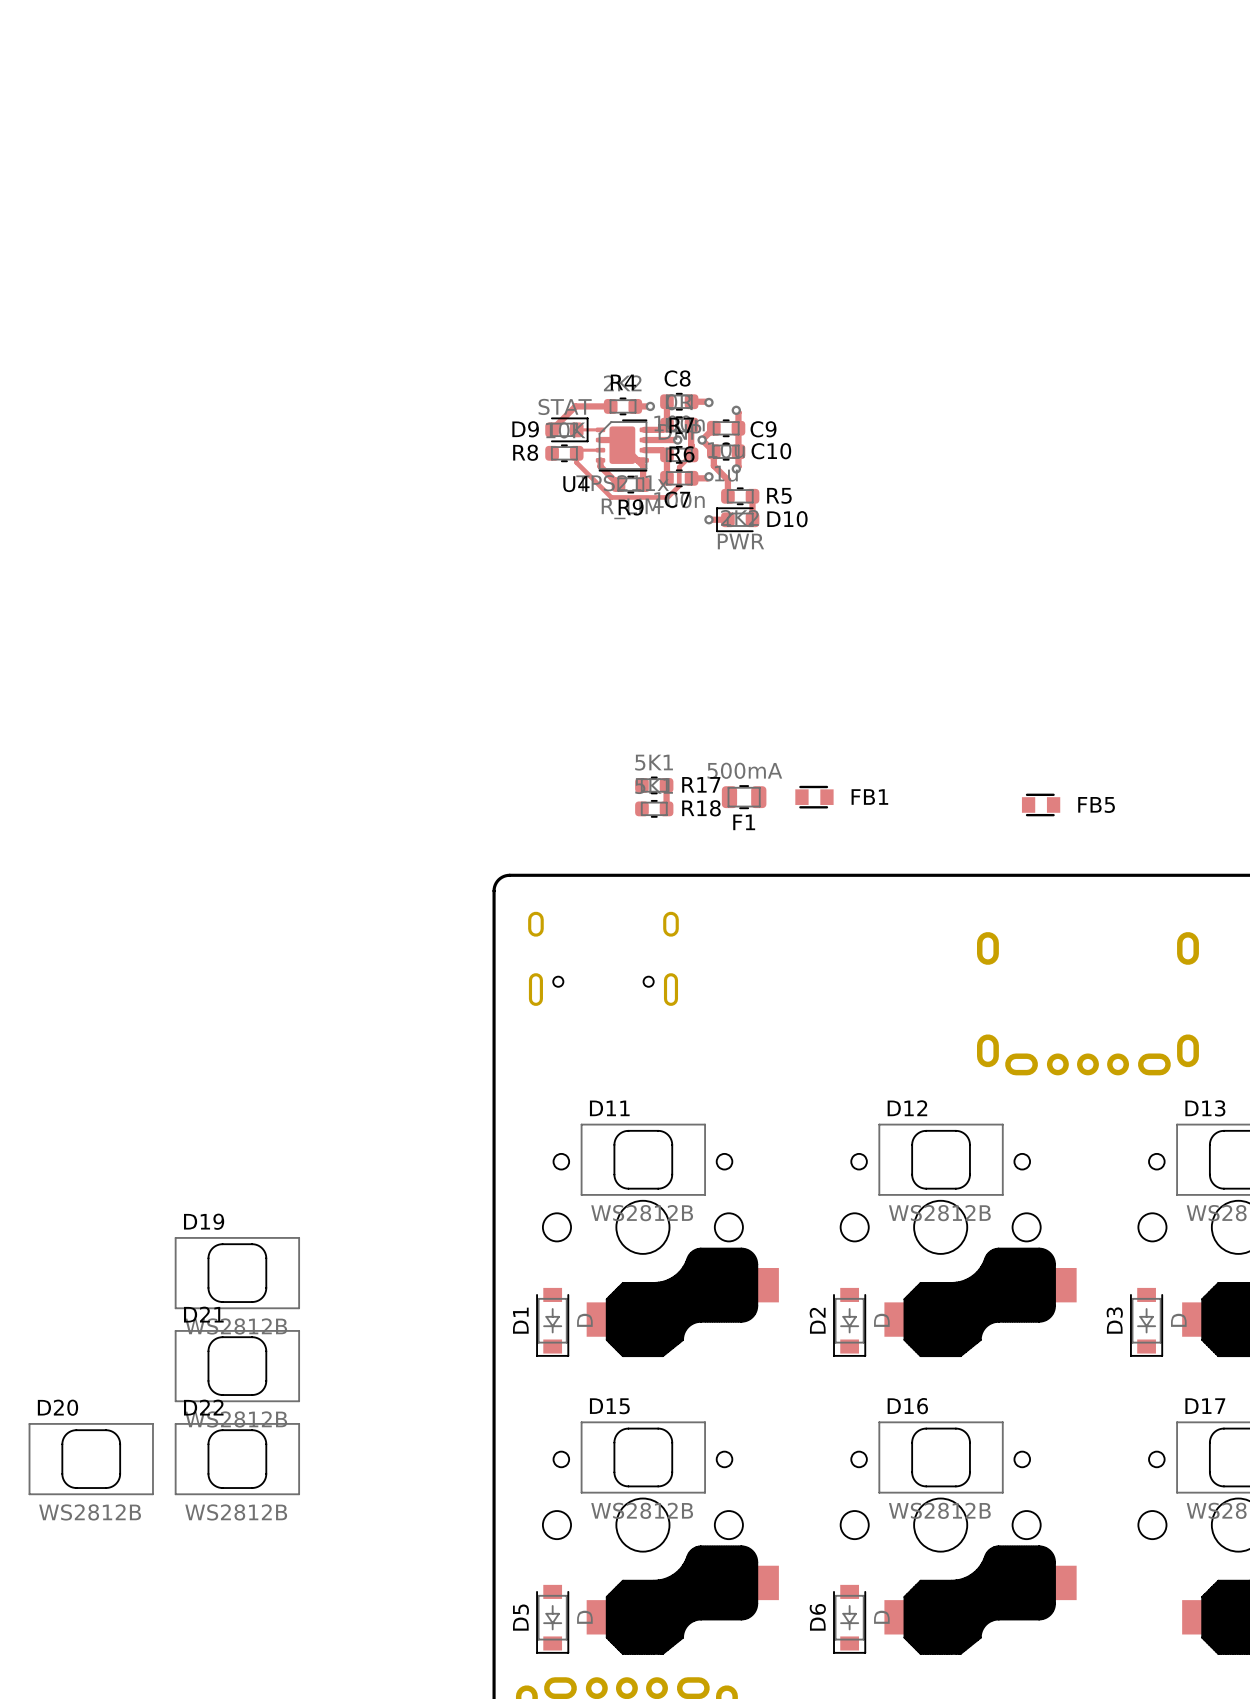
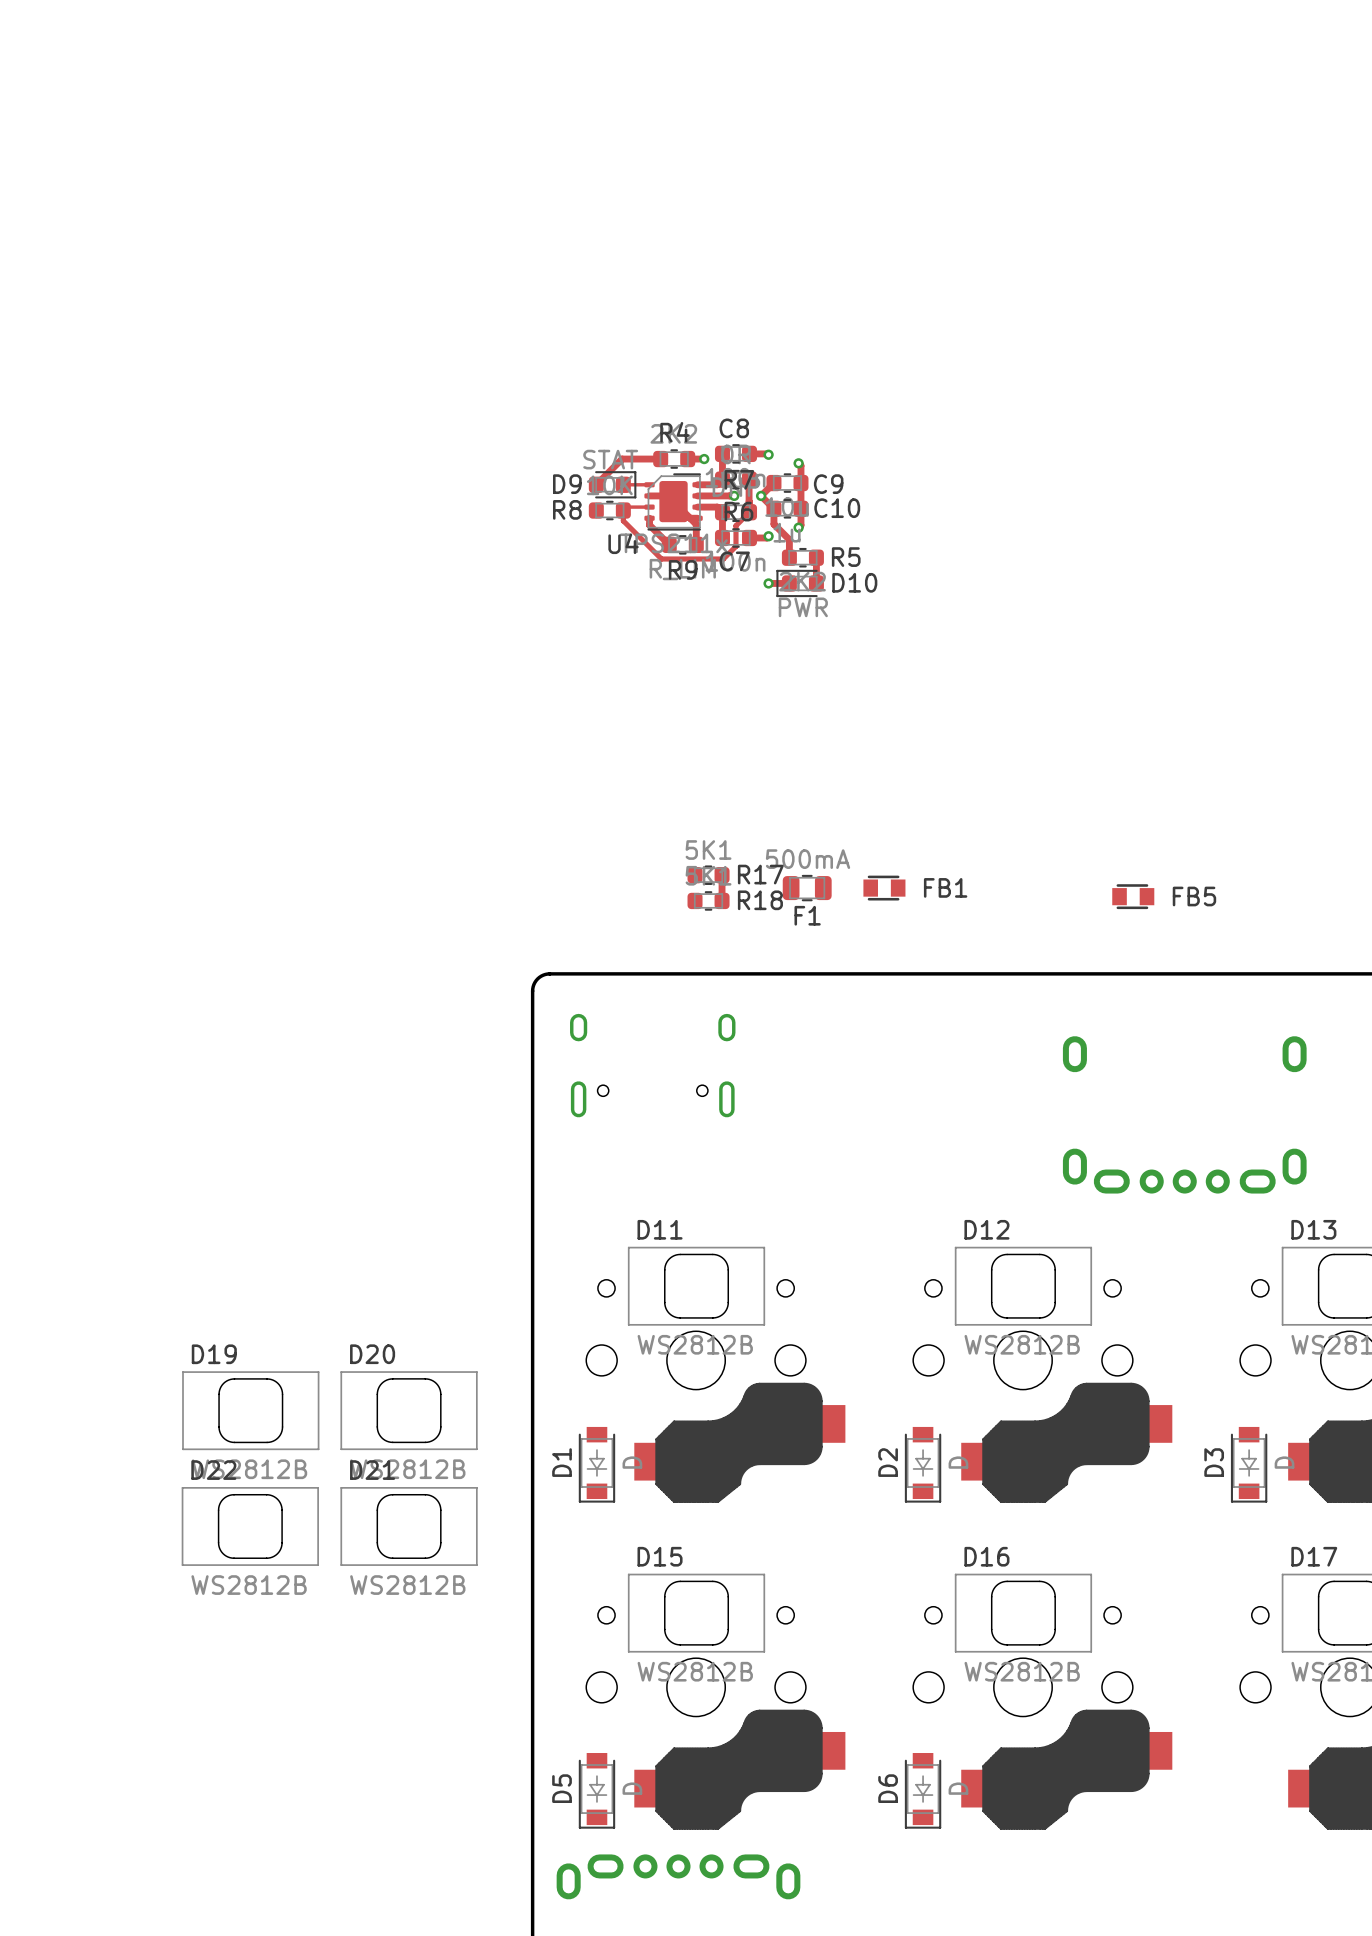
D21 position: (237, 1366) -> (409, 1526)
D20 position: (91, 1459) -> (409, 1410)
D22 position: (237, 1459) -> (250, 1526)

